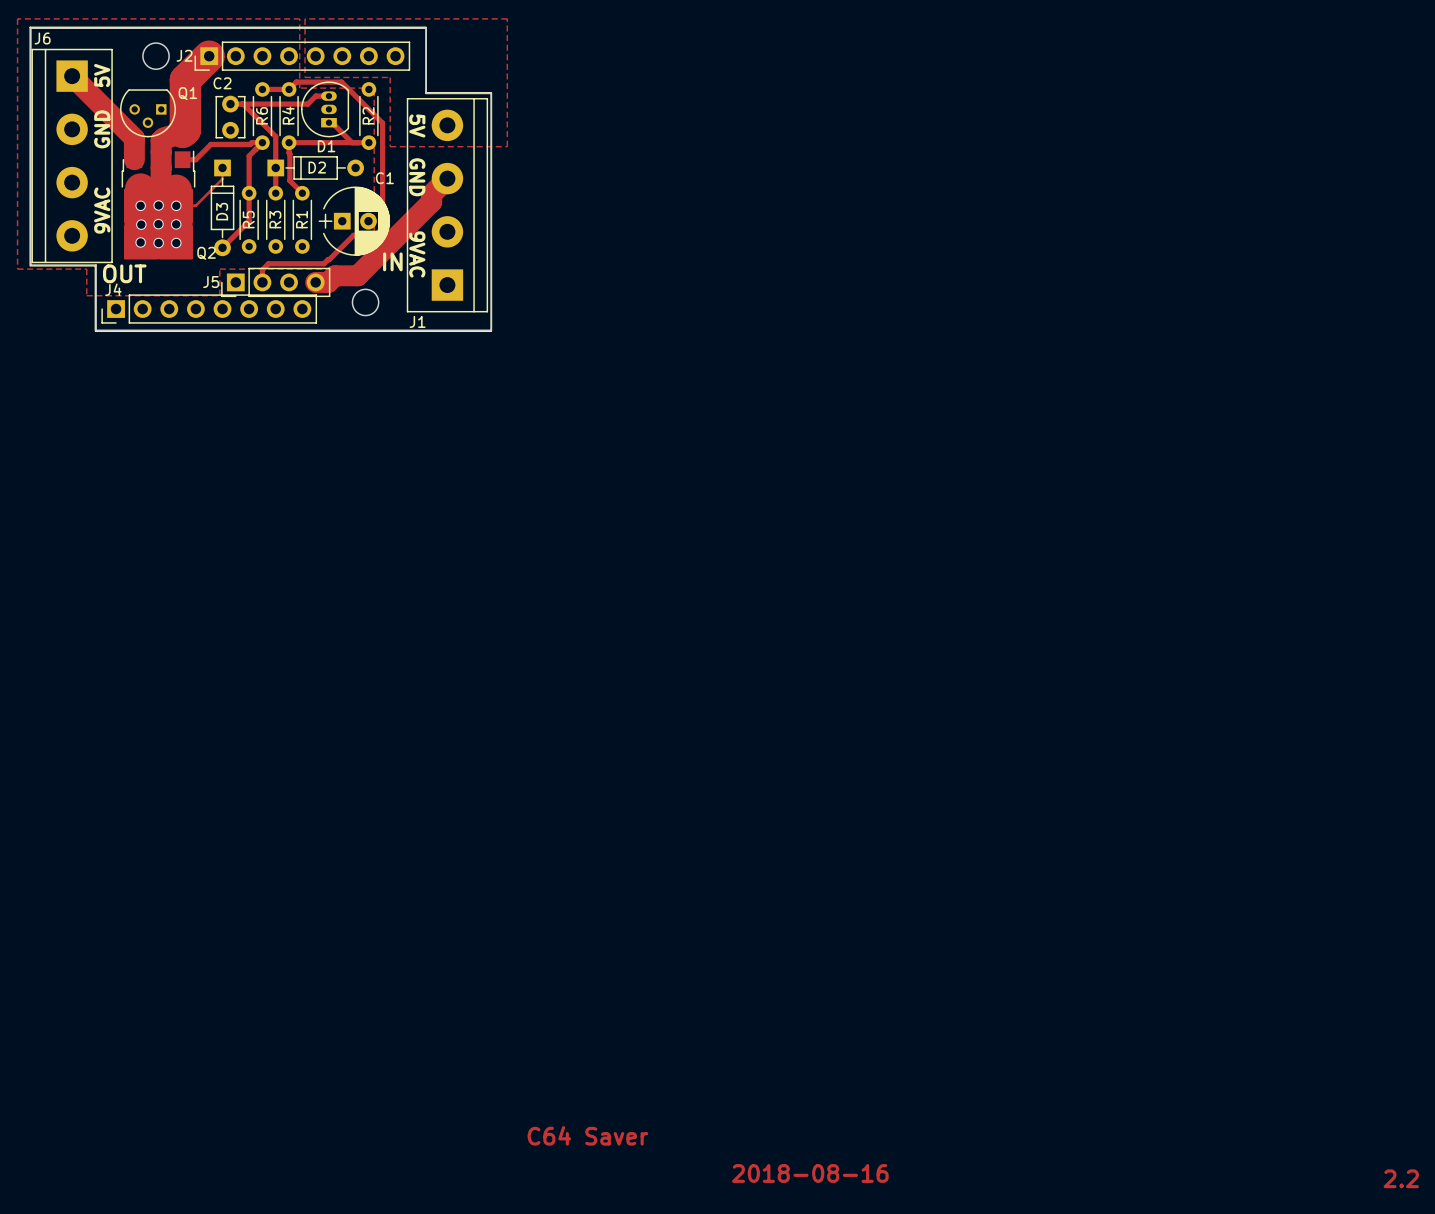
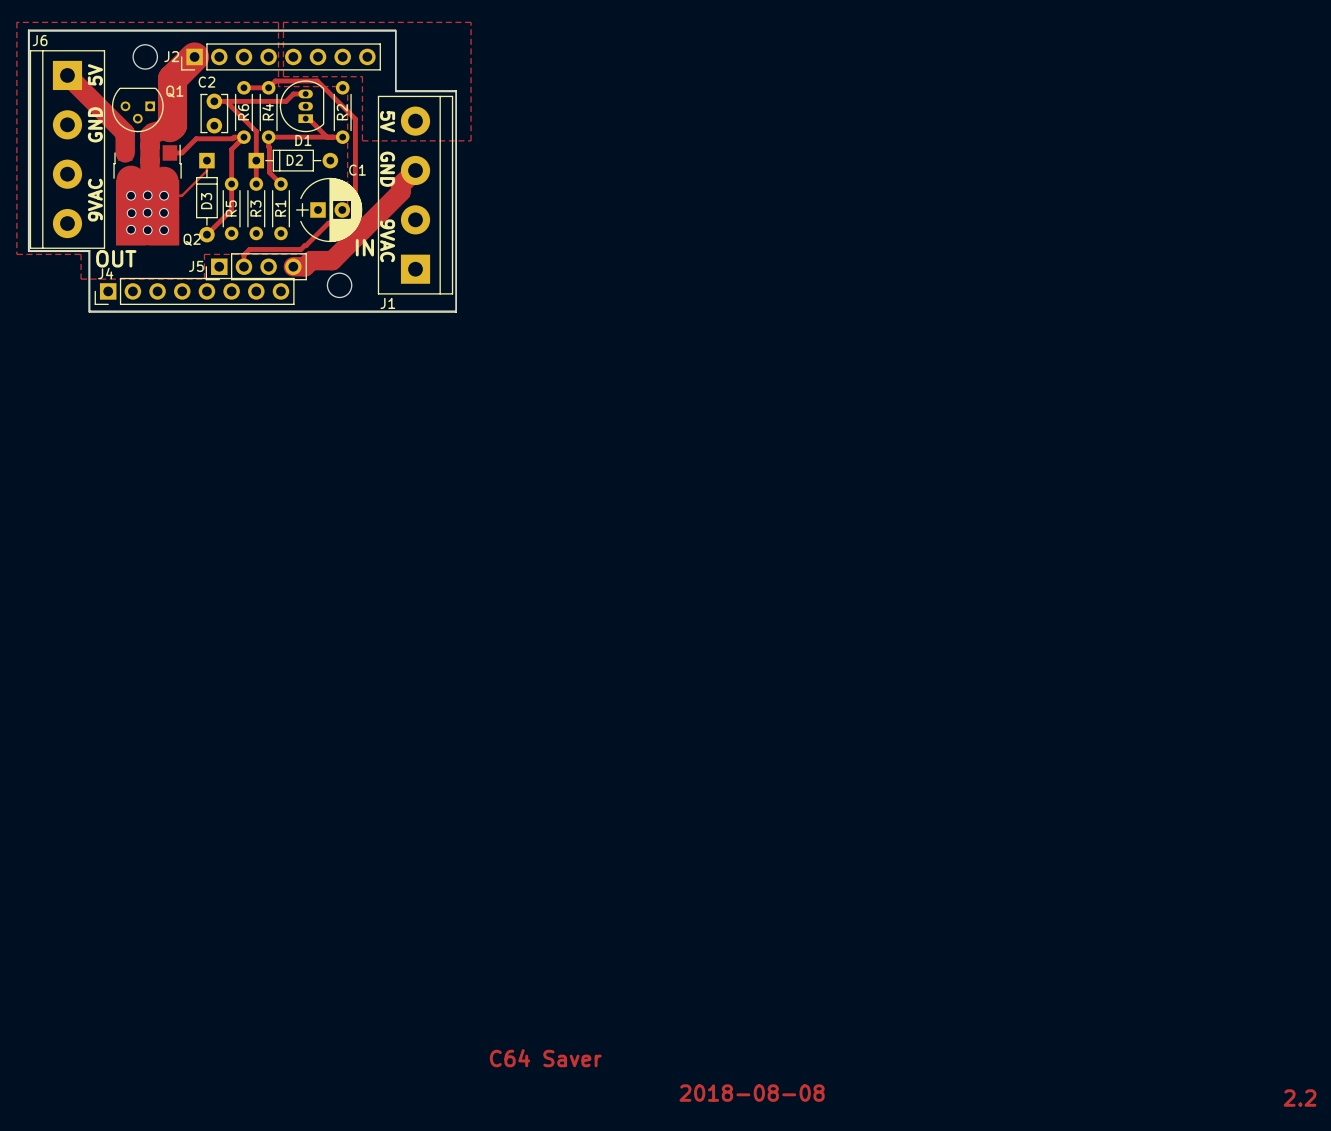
text: 2018-08-16 (810, 1173) -> 2018-08-08 (752, 1093)

